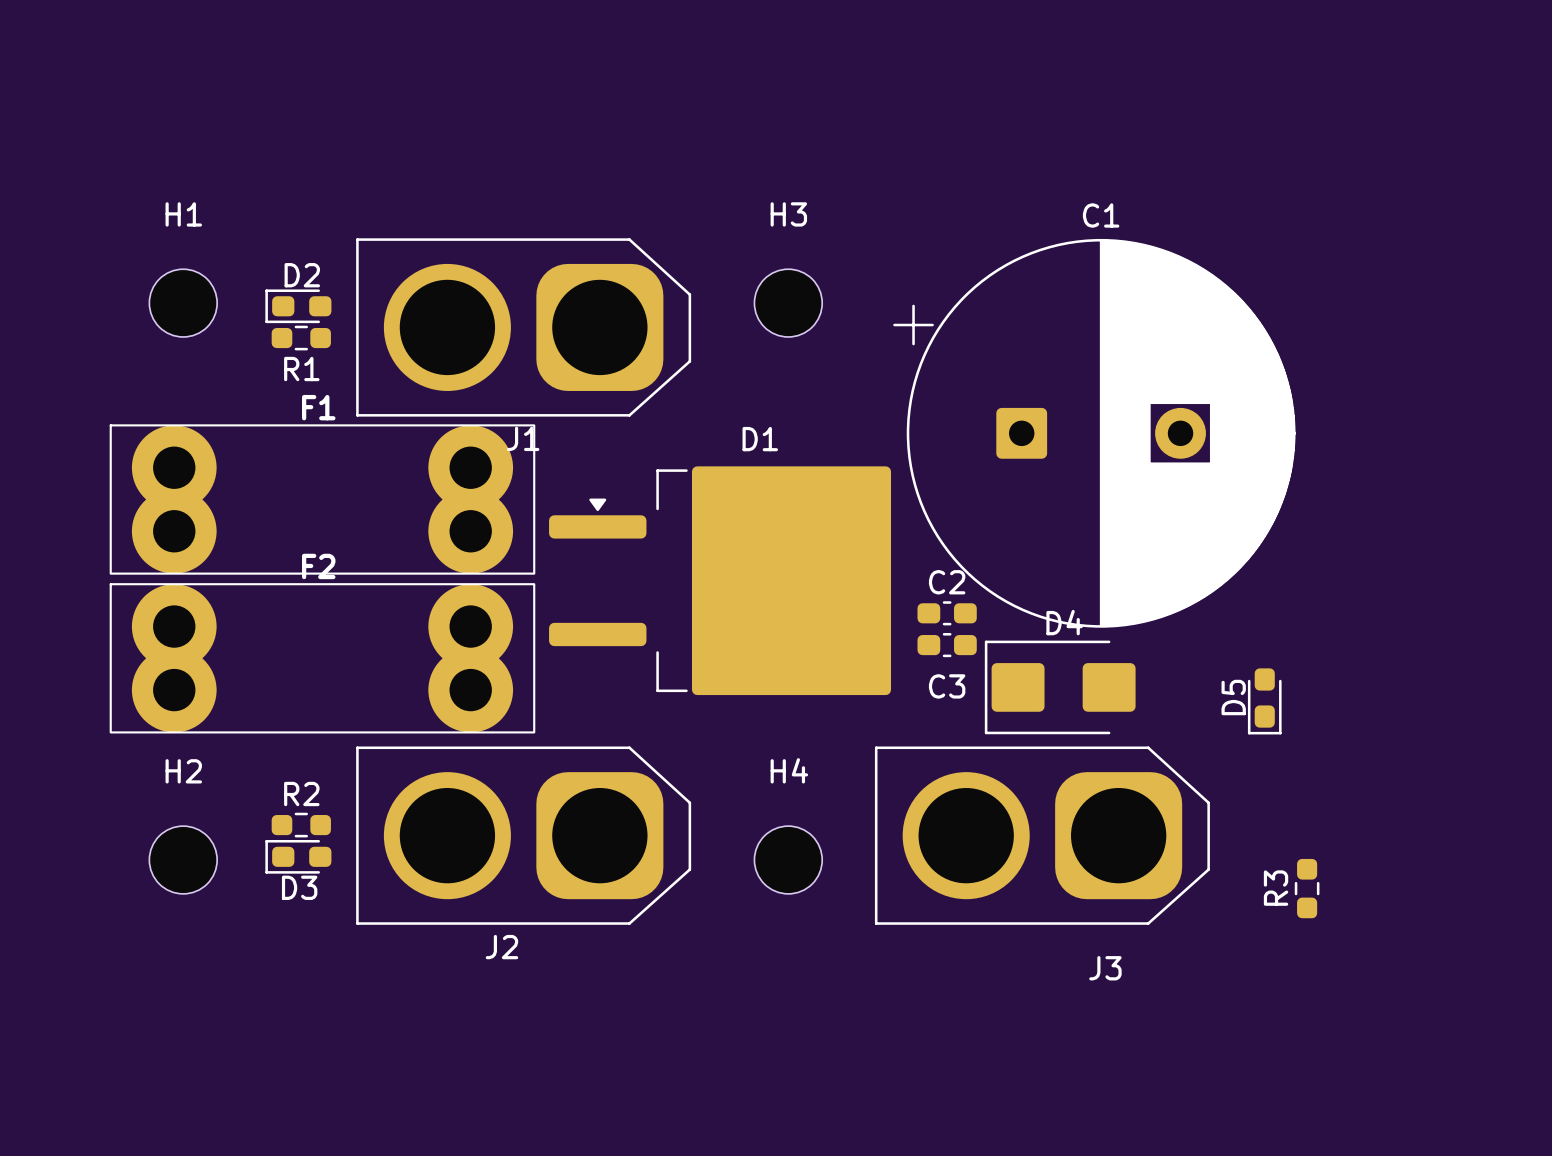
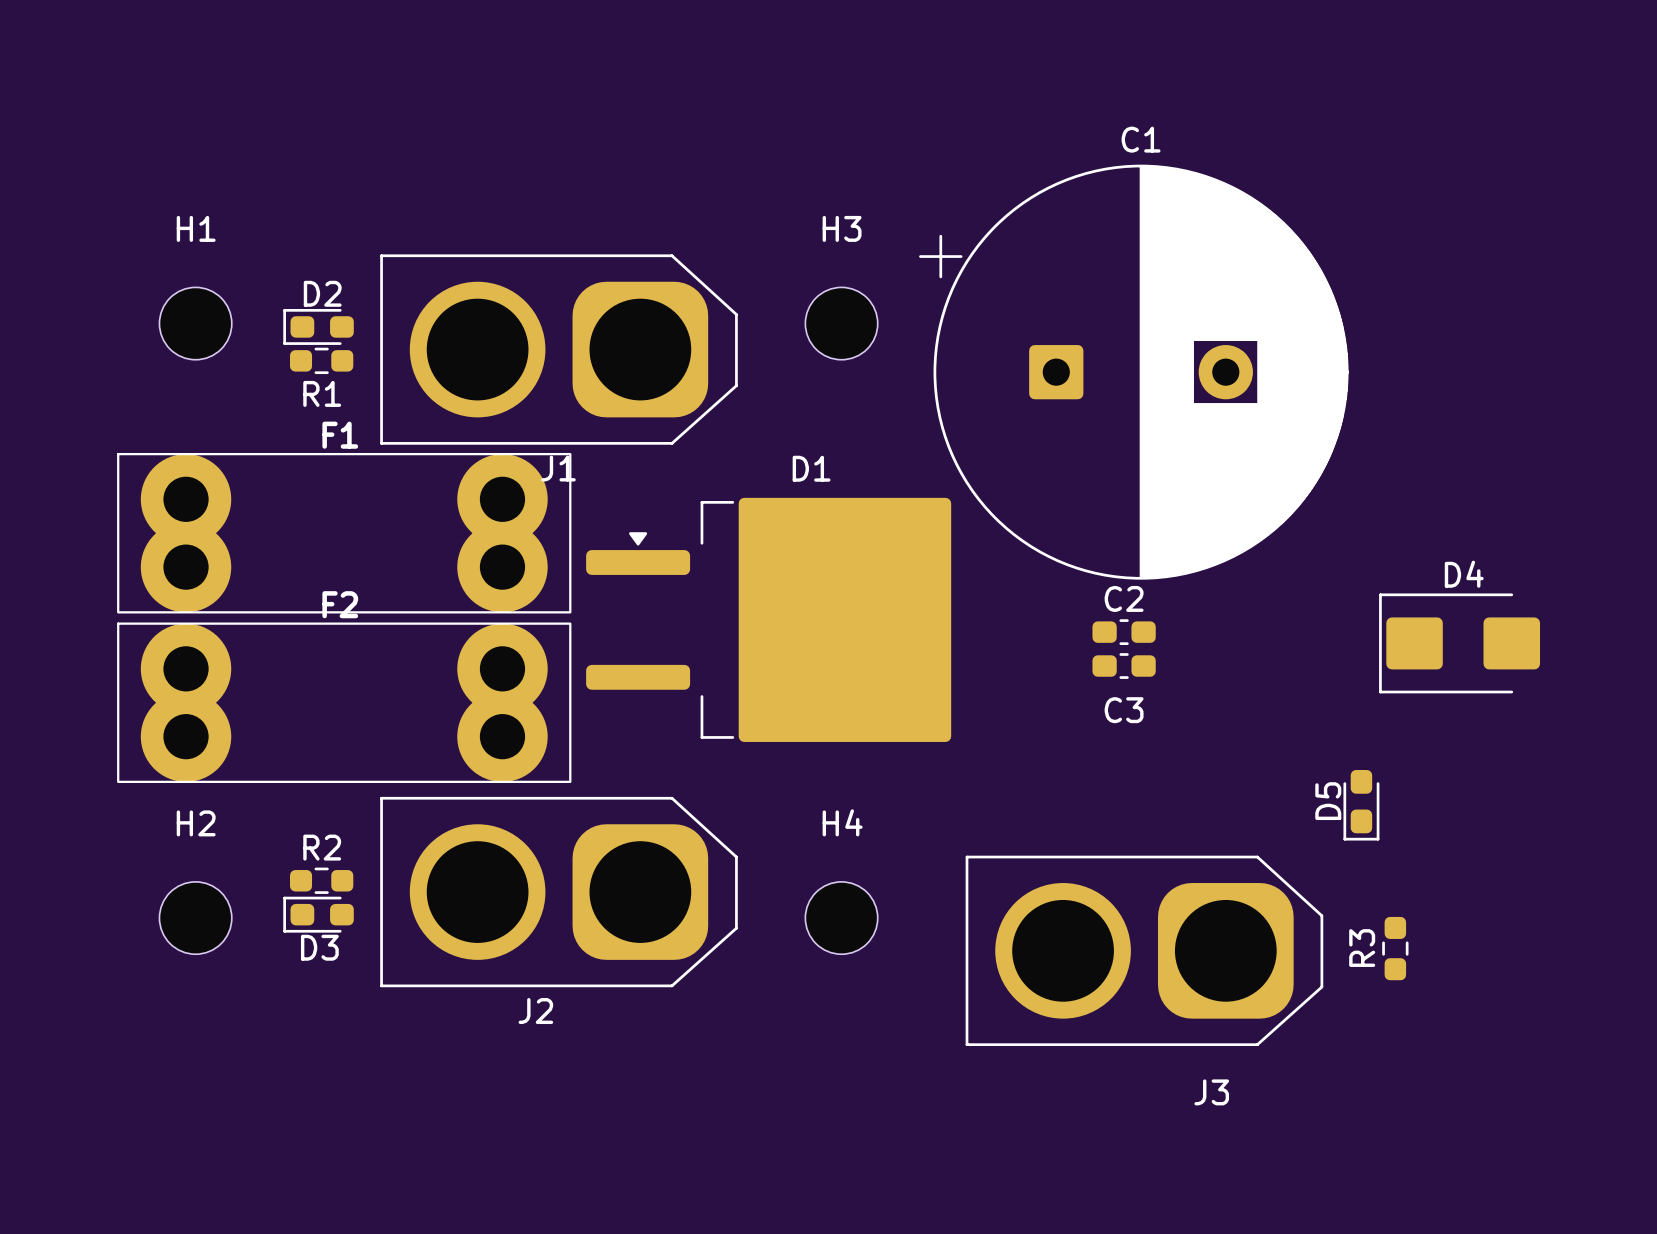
C1 position: (1094, 433) -> (1133, 372)
C2 position: (947, 613) -> (1124, 632)
C3 position: (947, 645) -> (1124, 666)
D4 position: (1060, 687) -> (1459, 643)
D5 position: (1264, 701) -> (1361, 805)
J3 position: (1042, 835) -> (1144, 950)

